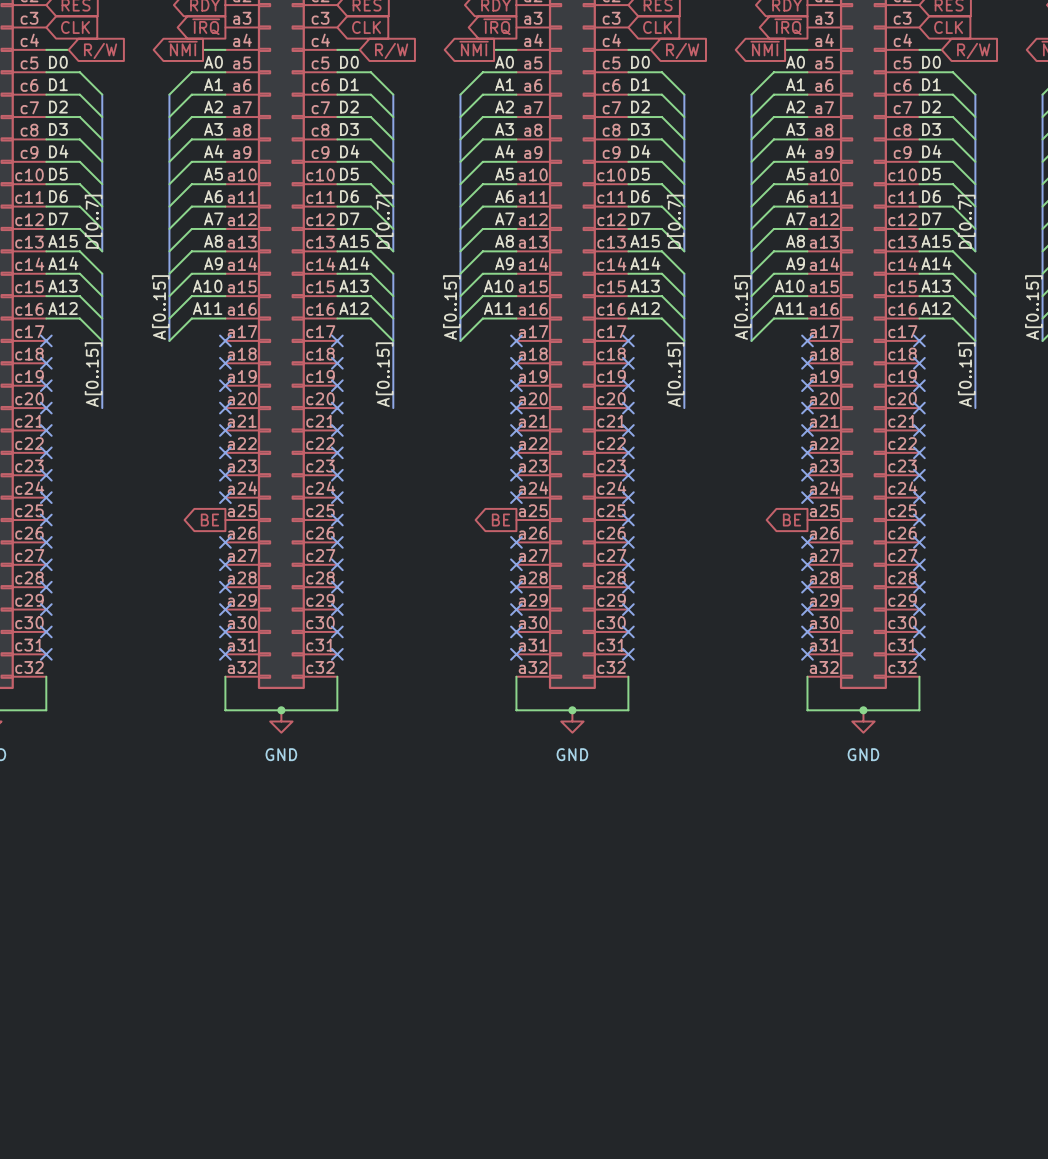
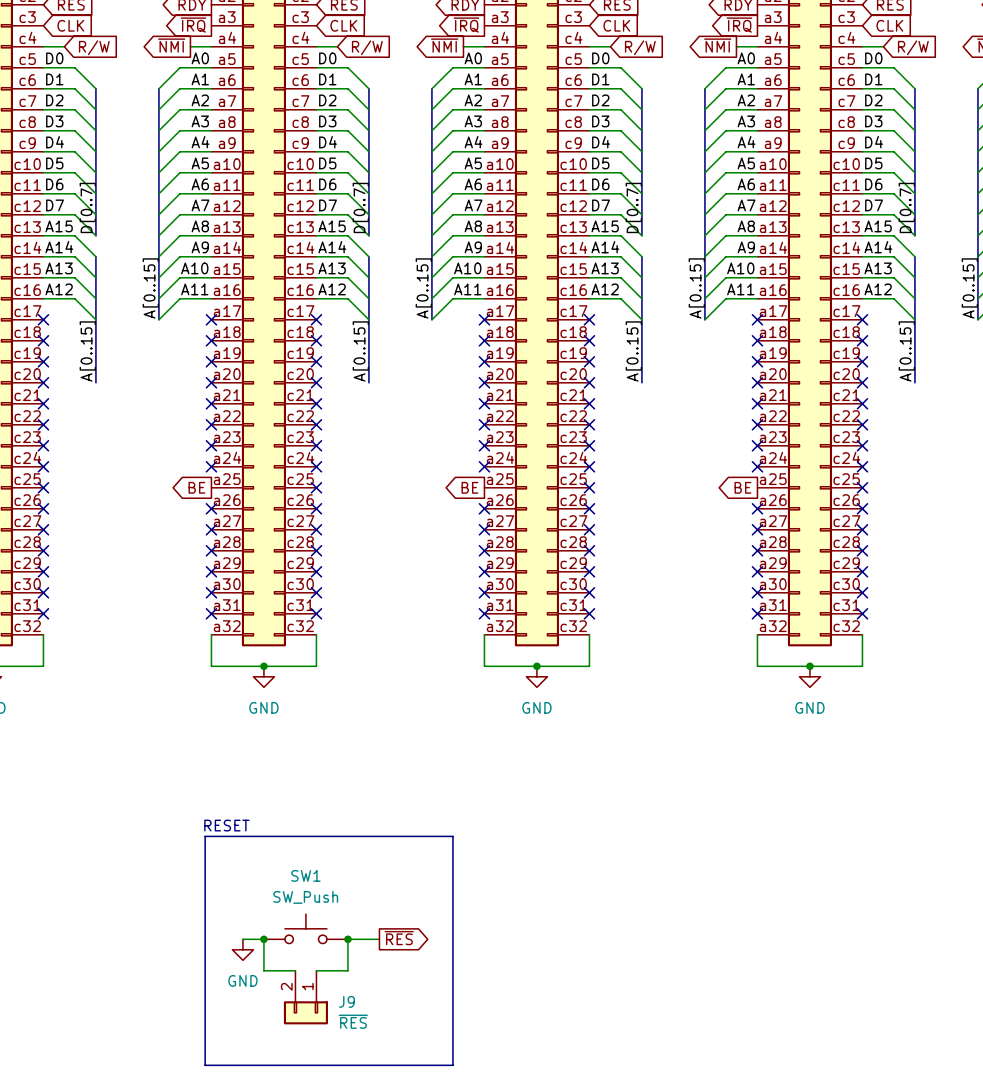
text: none -> RESET (226, 825)
line: none -> (205, 836) (452, 836) (452, 1065) (205, 1065) (205, 836)
SW1: none -> SW_Push (305, 928)
global label: none -> ~{RES} (399, 938)
wire: none -> (242, 939) (263, 939) (263, 970) (295, 970)
junction: none -> (263, 939)
junction: none -> (347, 939)
wire: none -> (379, 939) (347, 939) (347, 970) (316, 970)
power symbol: none -> GND (242, 949)
J9: none -> ~{RES} (305, 997)

